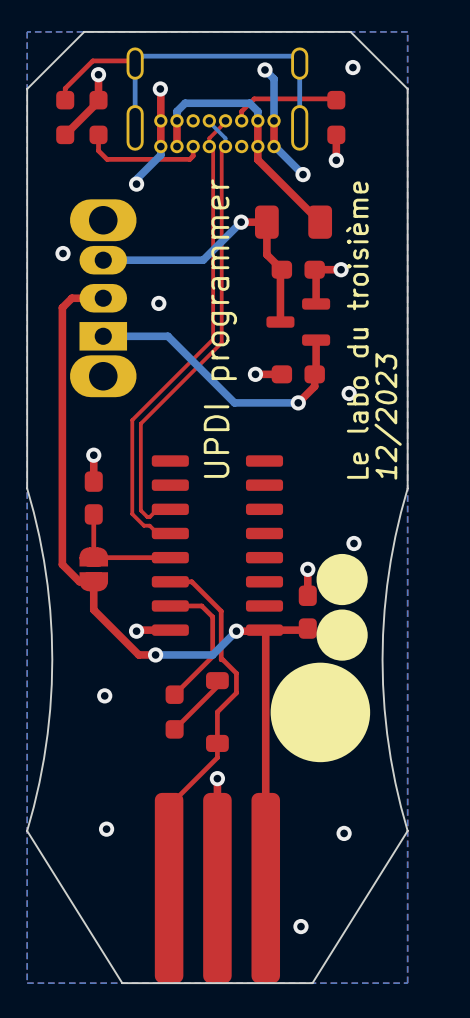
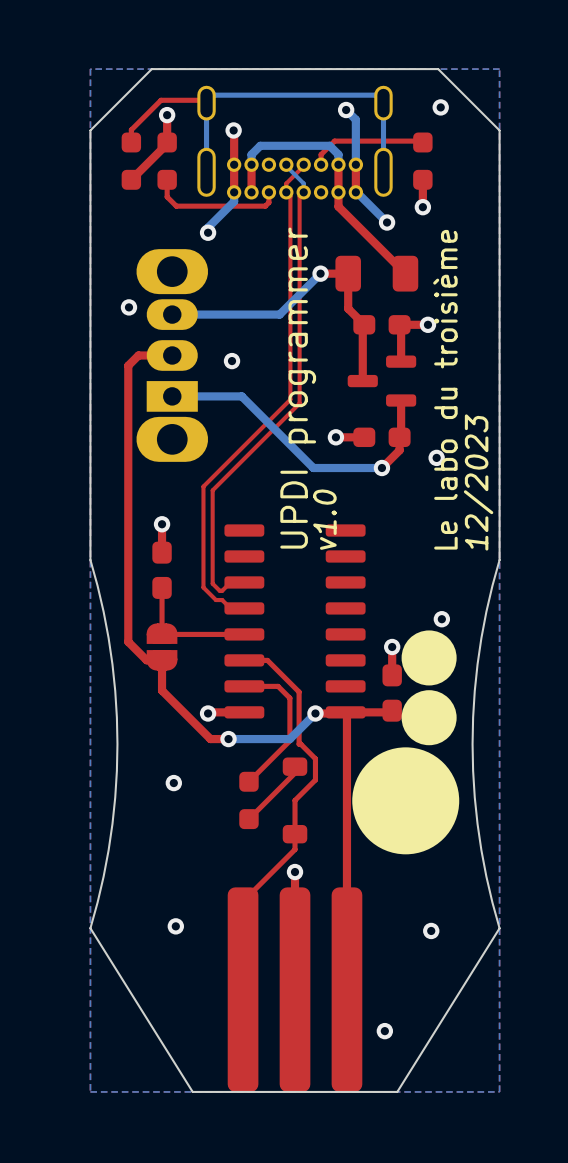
text: none -> v1.0 (324, 519)

